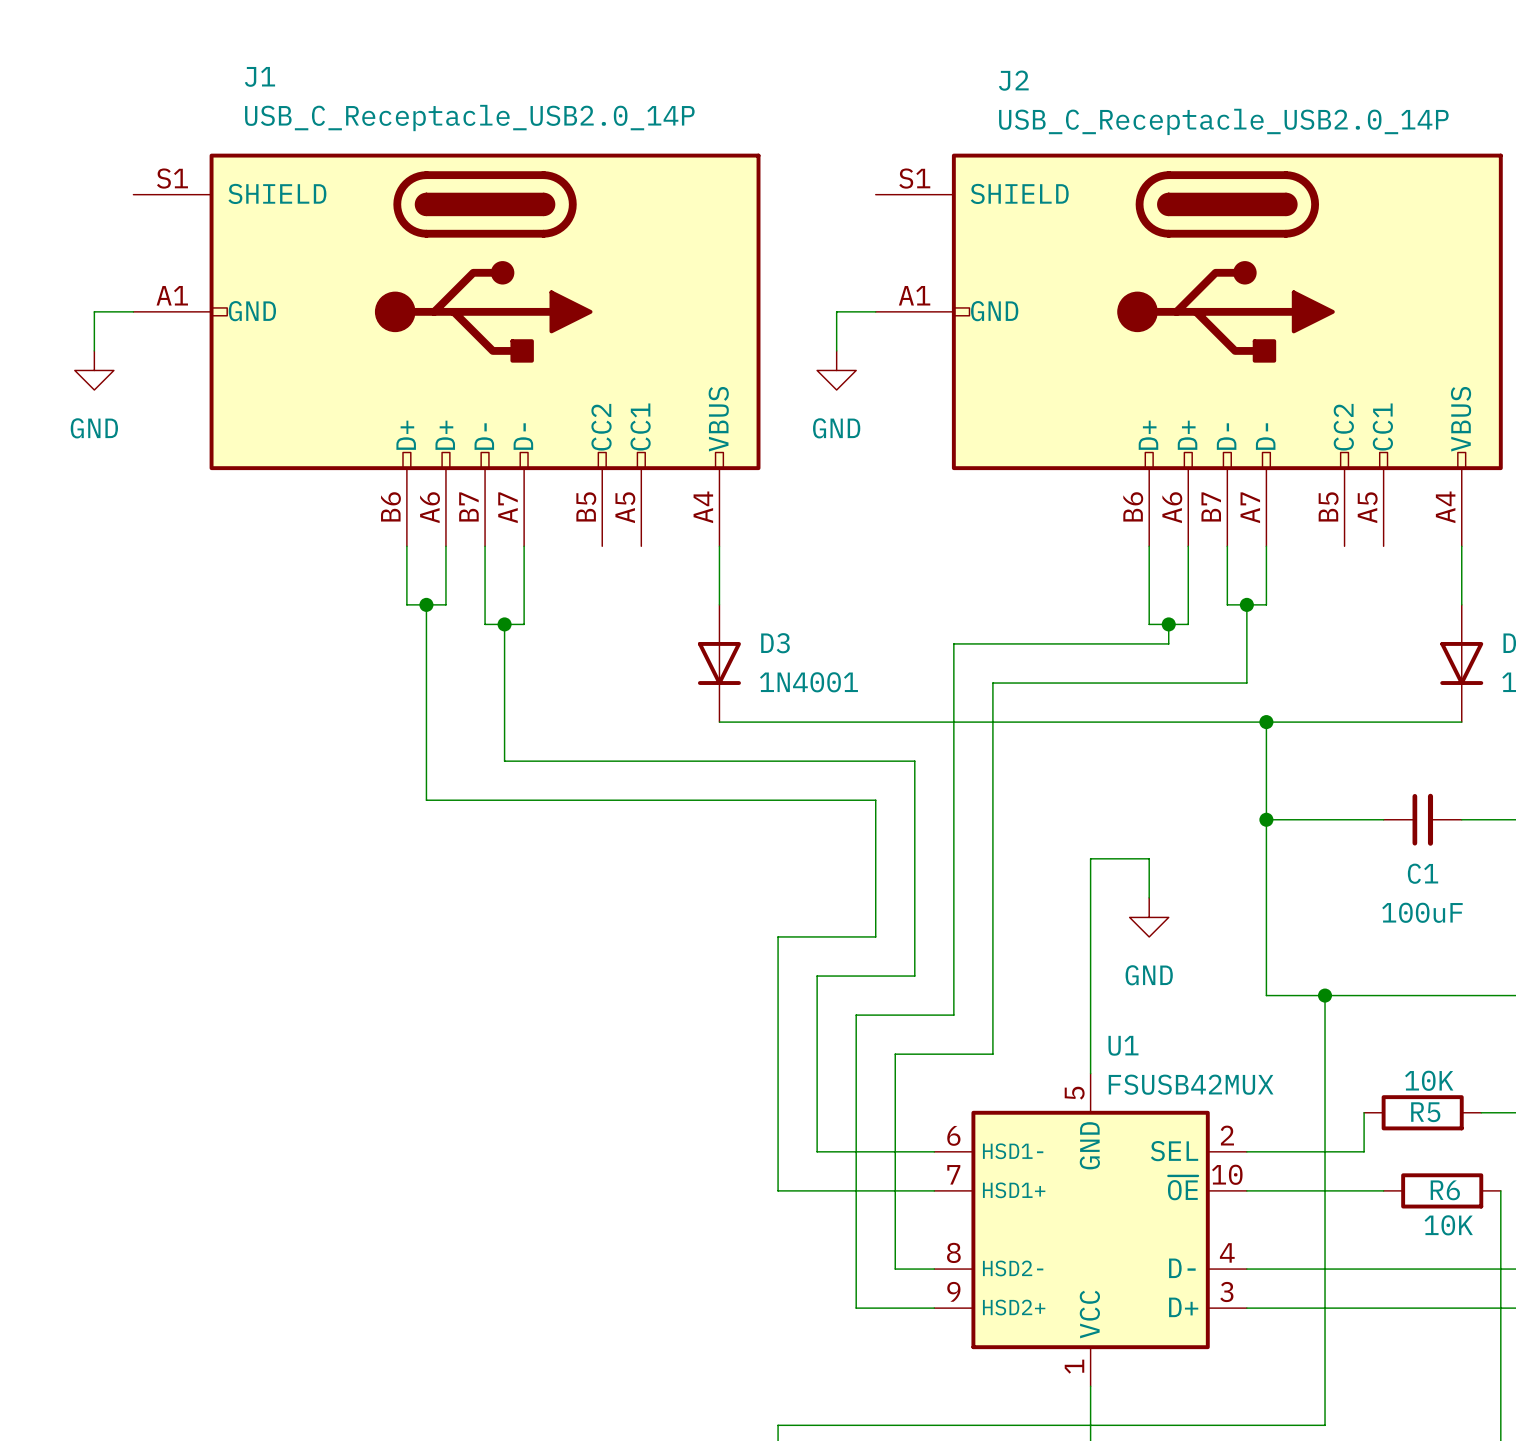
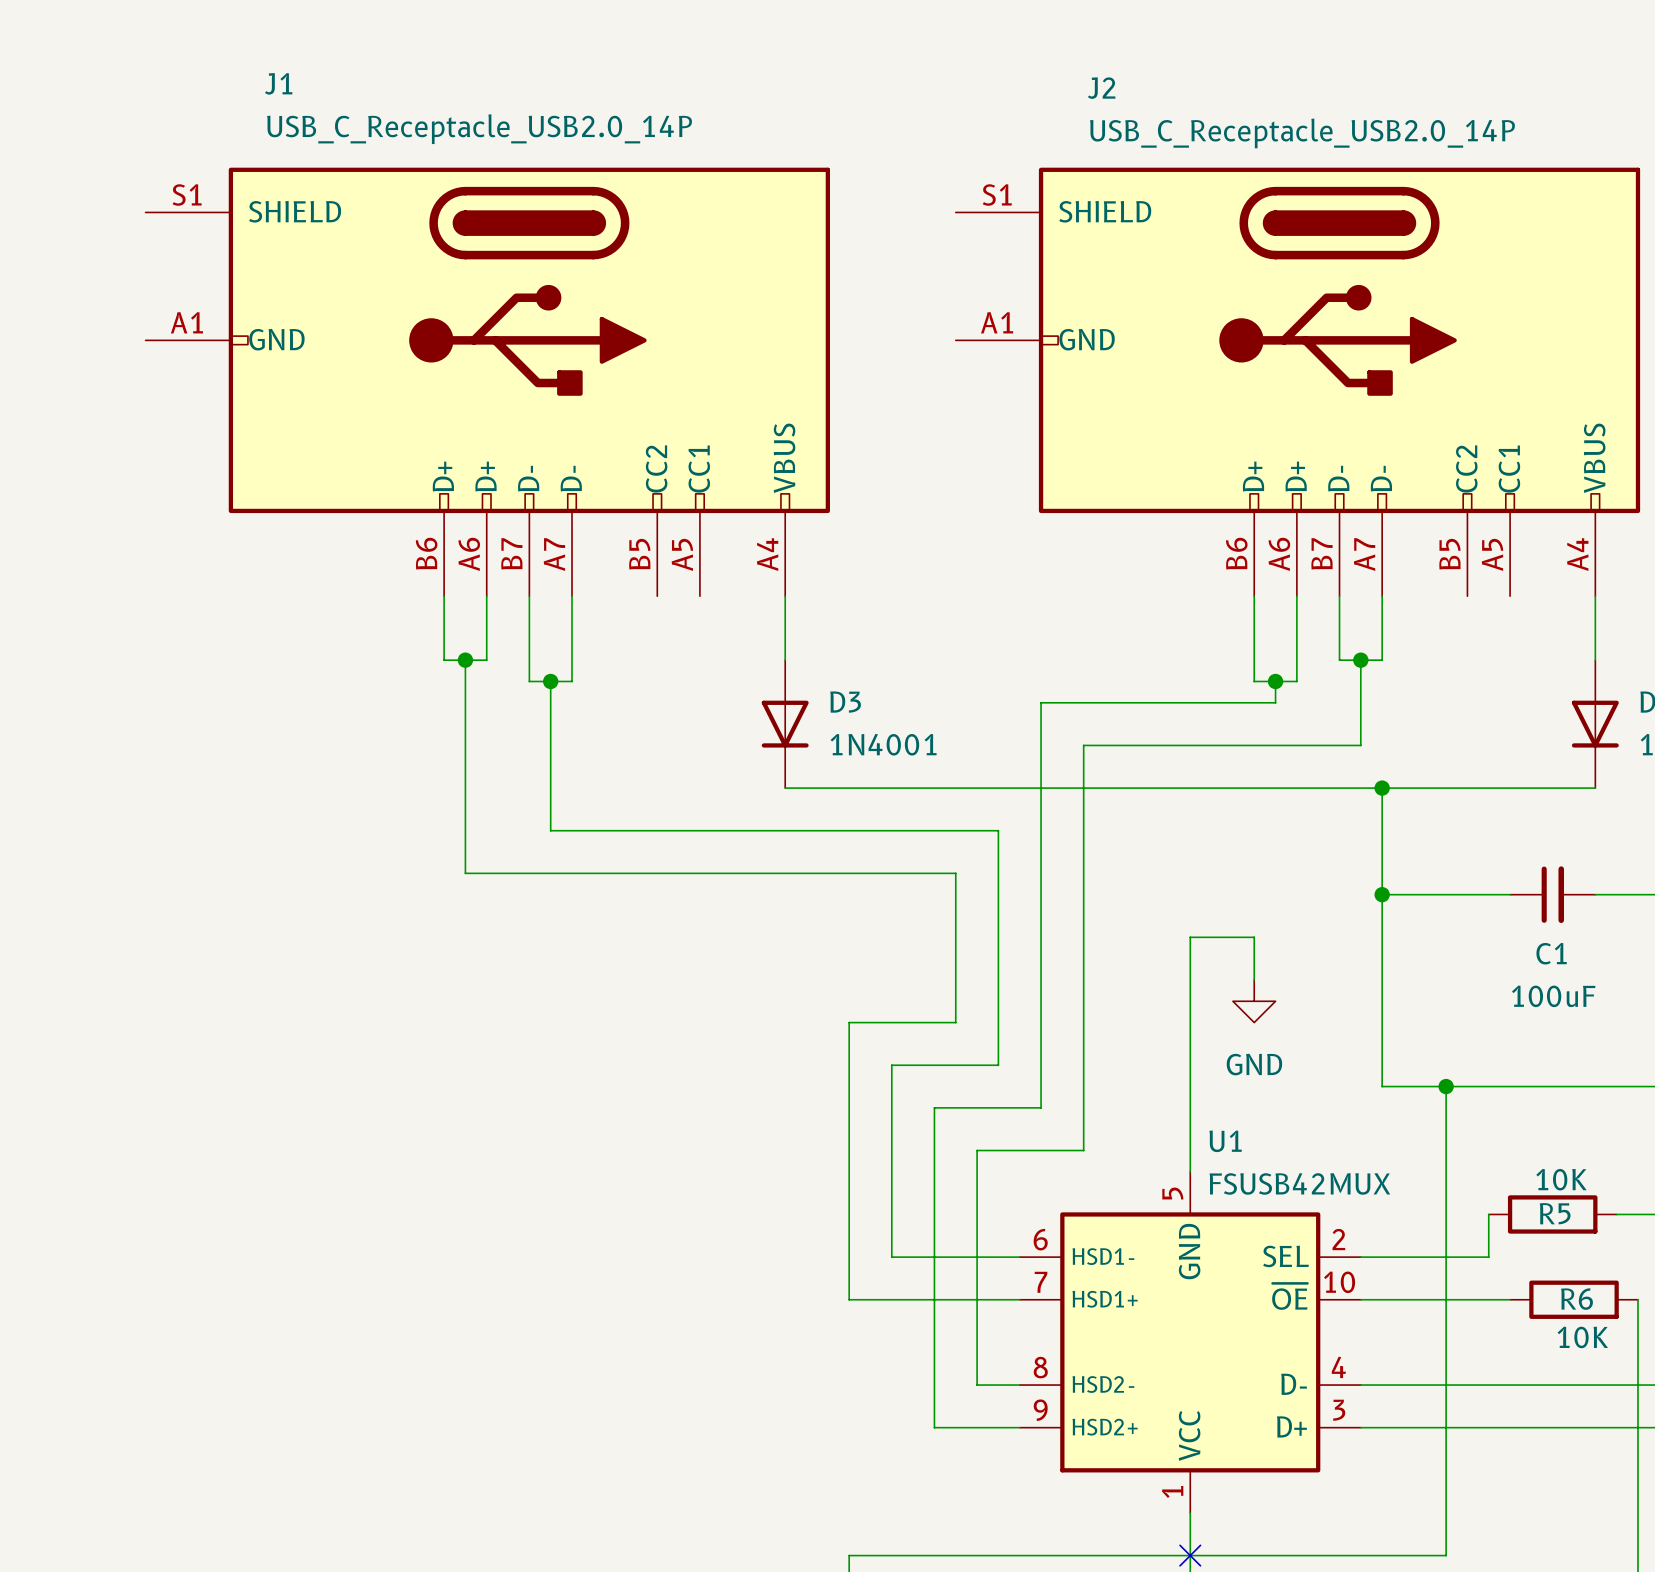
wire: (133, 311) (94, 311) (94, 350) -> none
wire: (875, 311) (836, 311) (836, 350) -> none
power symbol: GND (94, 370) -> none
power symbol: GND (836, 370) -> none
no-connect mark: none -> (1190, 1555)

